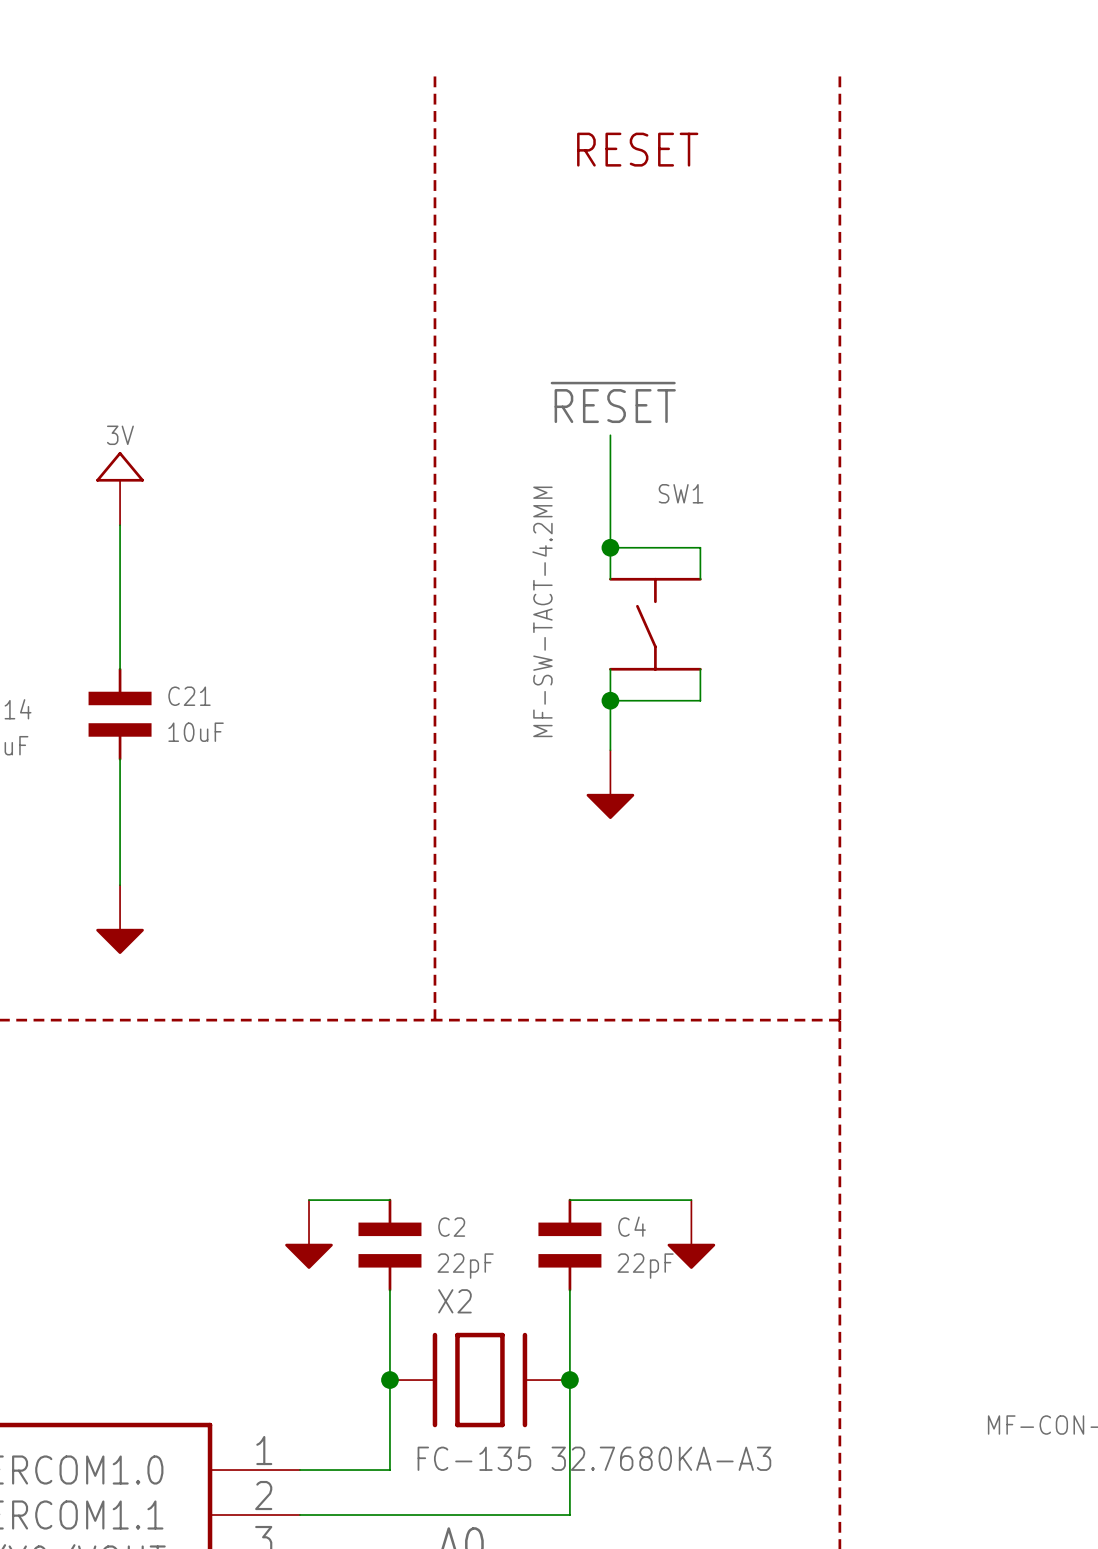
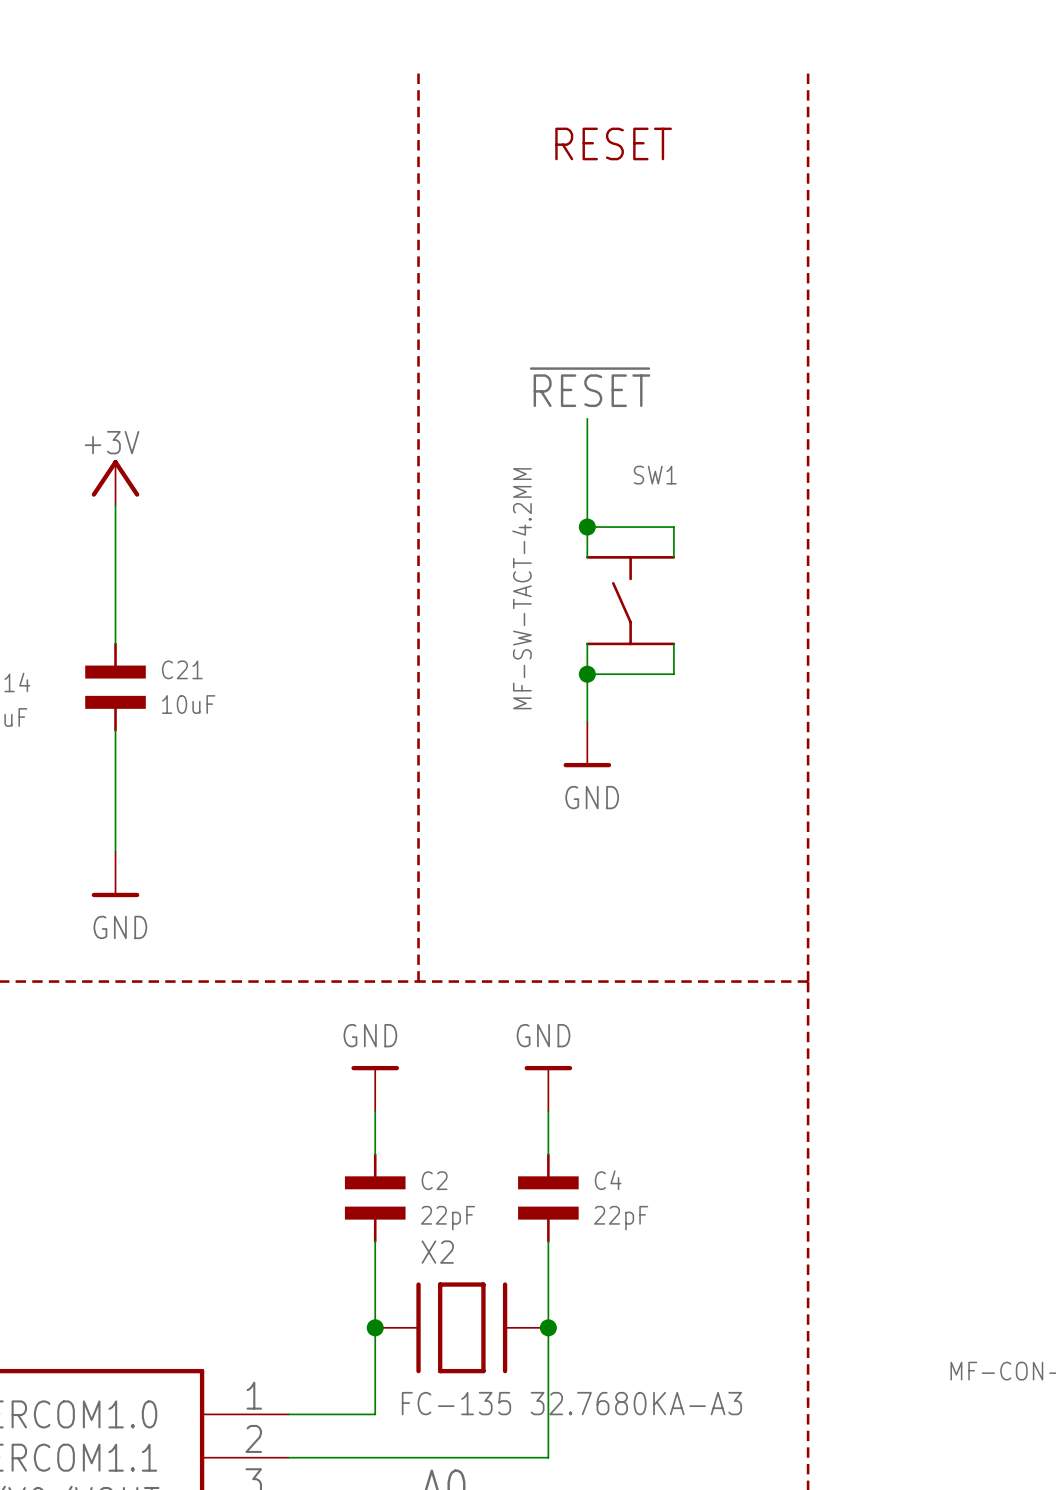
power symbol: 3V (120, 488) -> +3V (115, 482)
power symbol shape: [586, 750, 635, 820] -> [563, 721, 612, 768]
power symbol text: none -> GND (592, 797)
power symbol shape: [96, 885, 144, 955] -> [91, 851, 140, 898]
power symbol text: none -> GND (120, 927)
power symbol: none -> GND (375, 1088)
power symbol: none -> GND (548, 1088)
wire: (309, 1200) (389, 1200) -> (375, 1111) (375, 1154)
wire: (569, 1200) (691, 1200) -> (548, 1154) (548, 1111)
power symbol: (309, 1234) -> none
power symbol: (691, 1234) -> none

